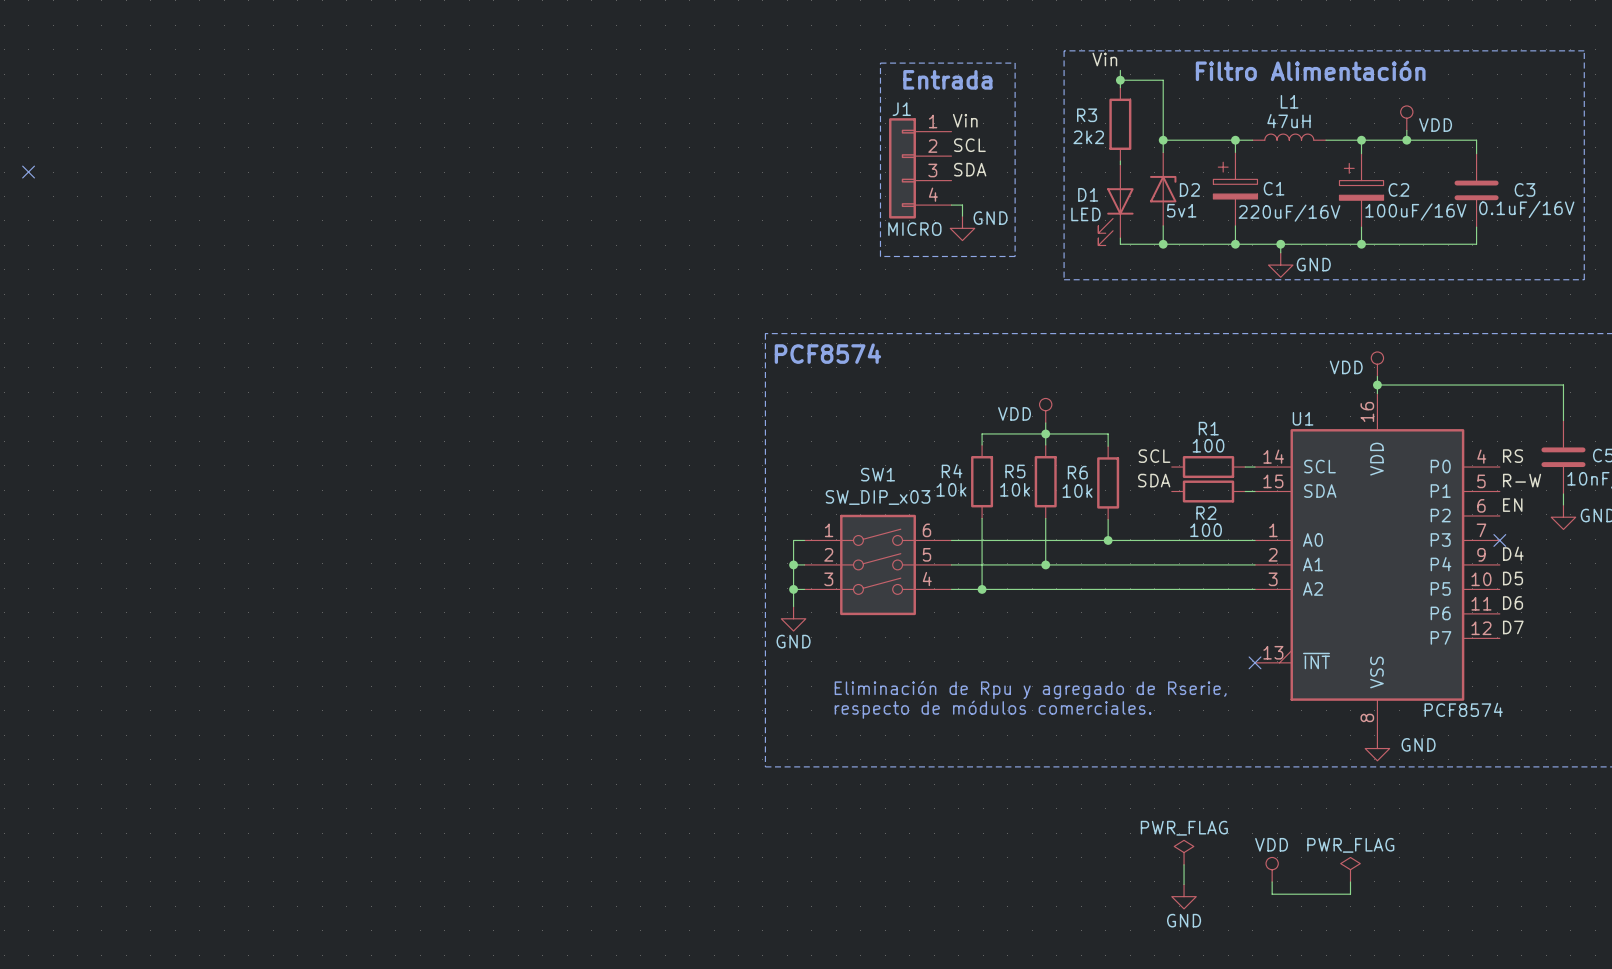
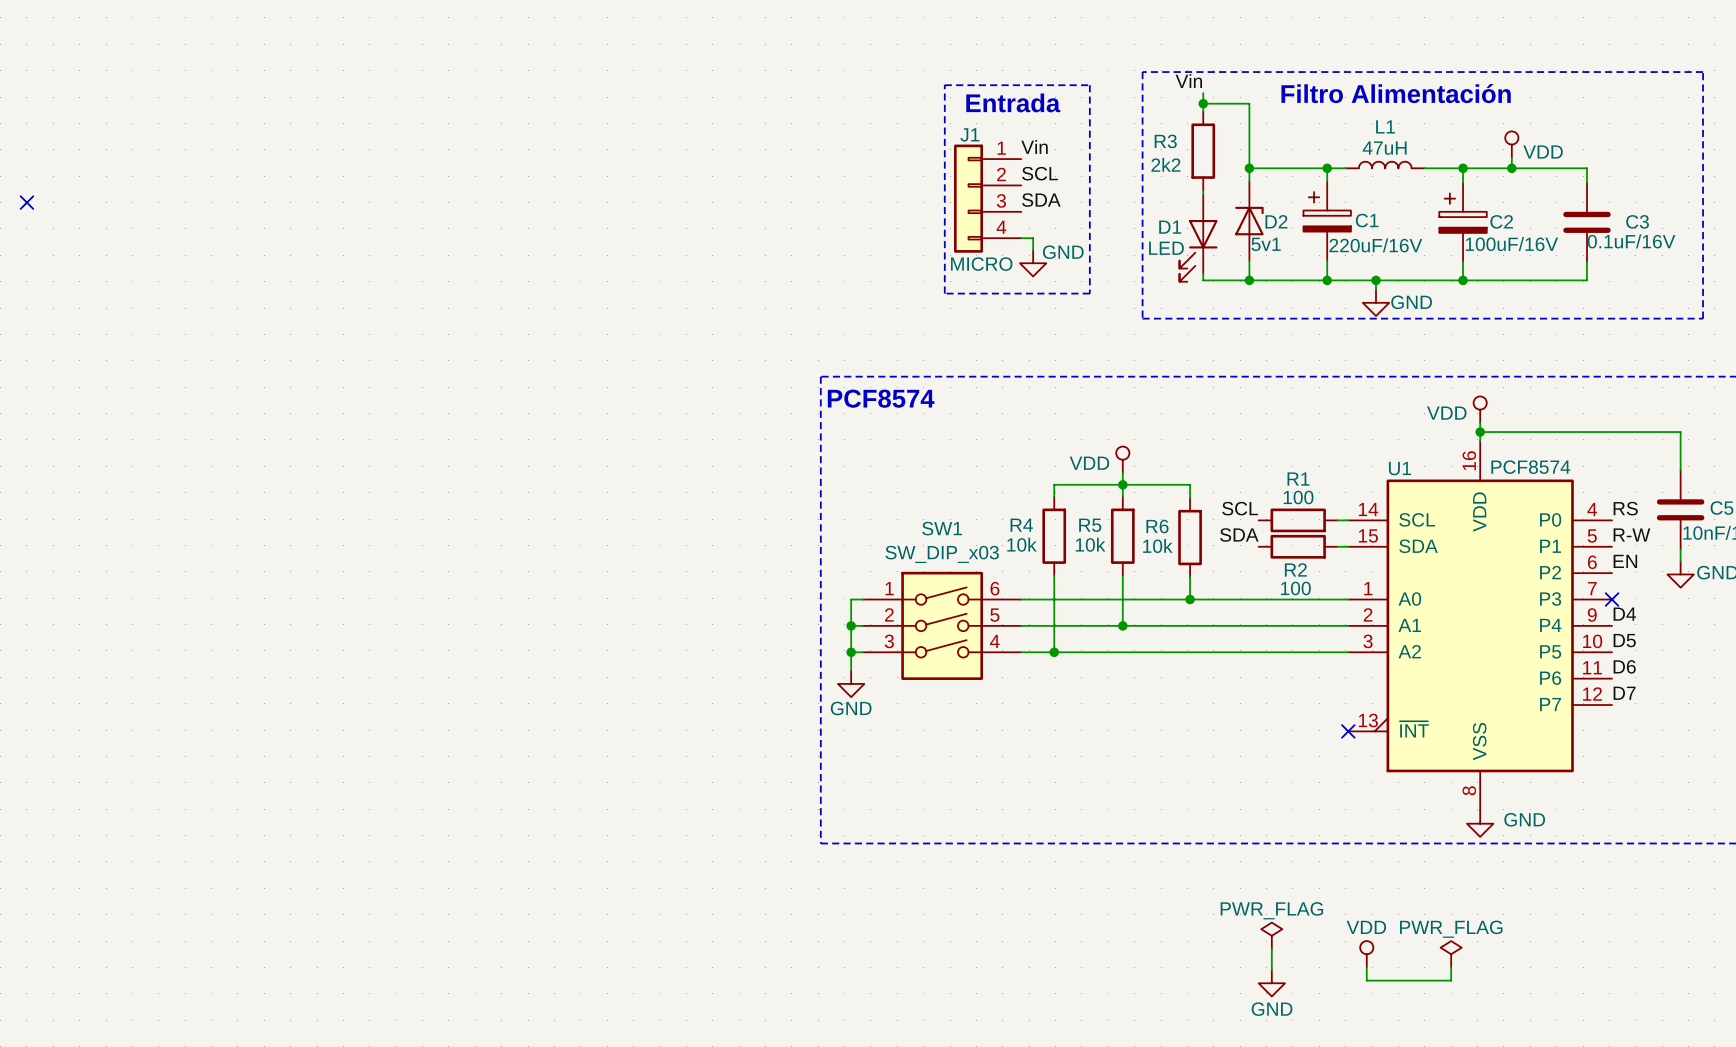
text: Eliminación de Rpu y agregado de Rserie, (1030, 689) -> none
text: respecto de módulos comerciales. (993, 709) -> none
U1 value position: PCF8574 (1463, 709) -> PCF8574 (1530, 467)

